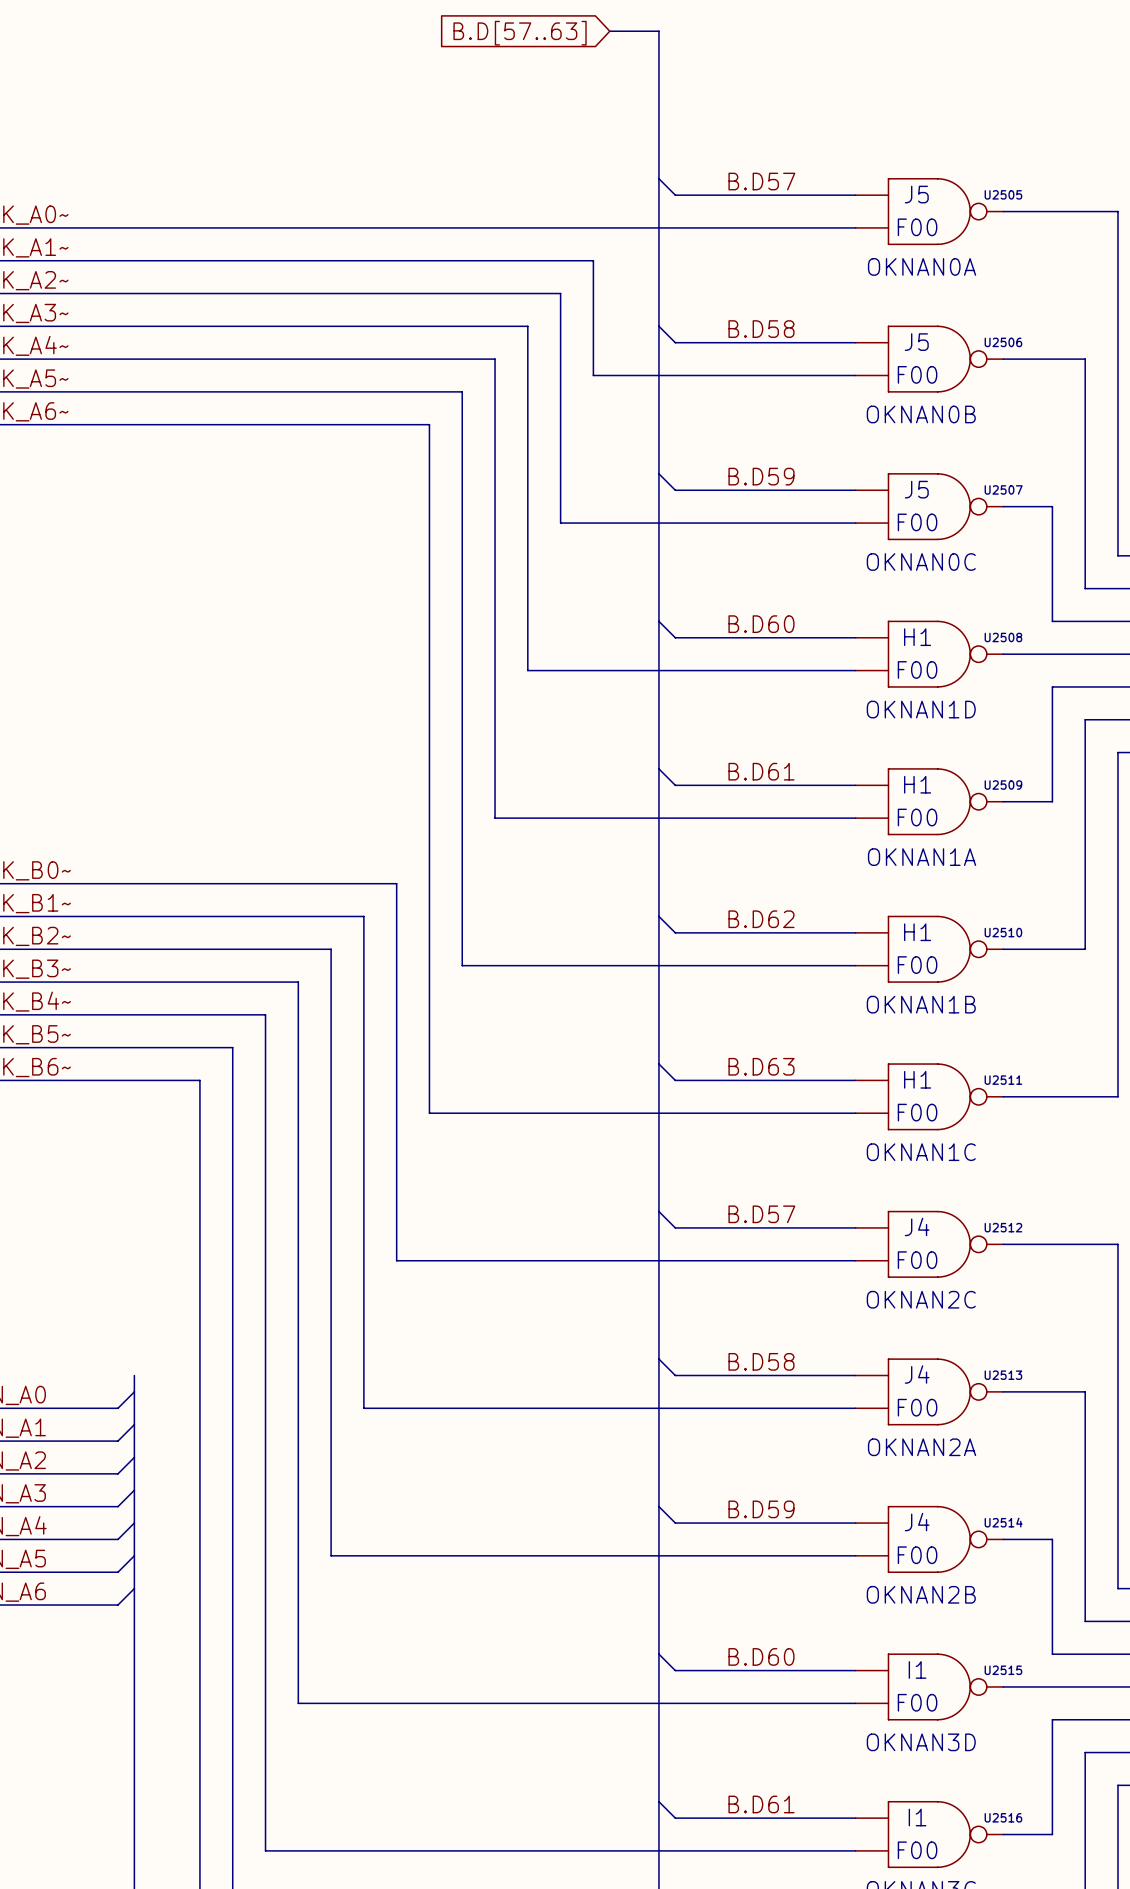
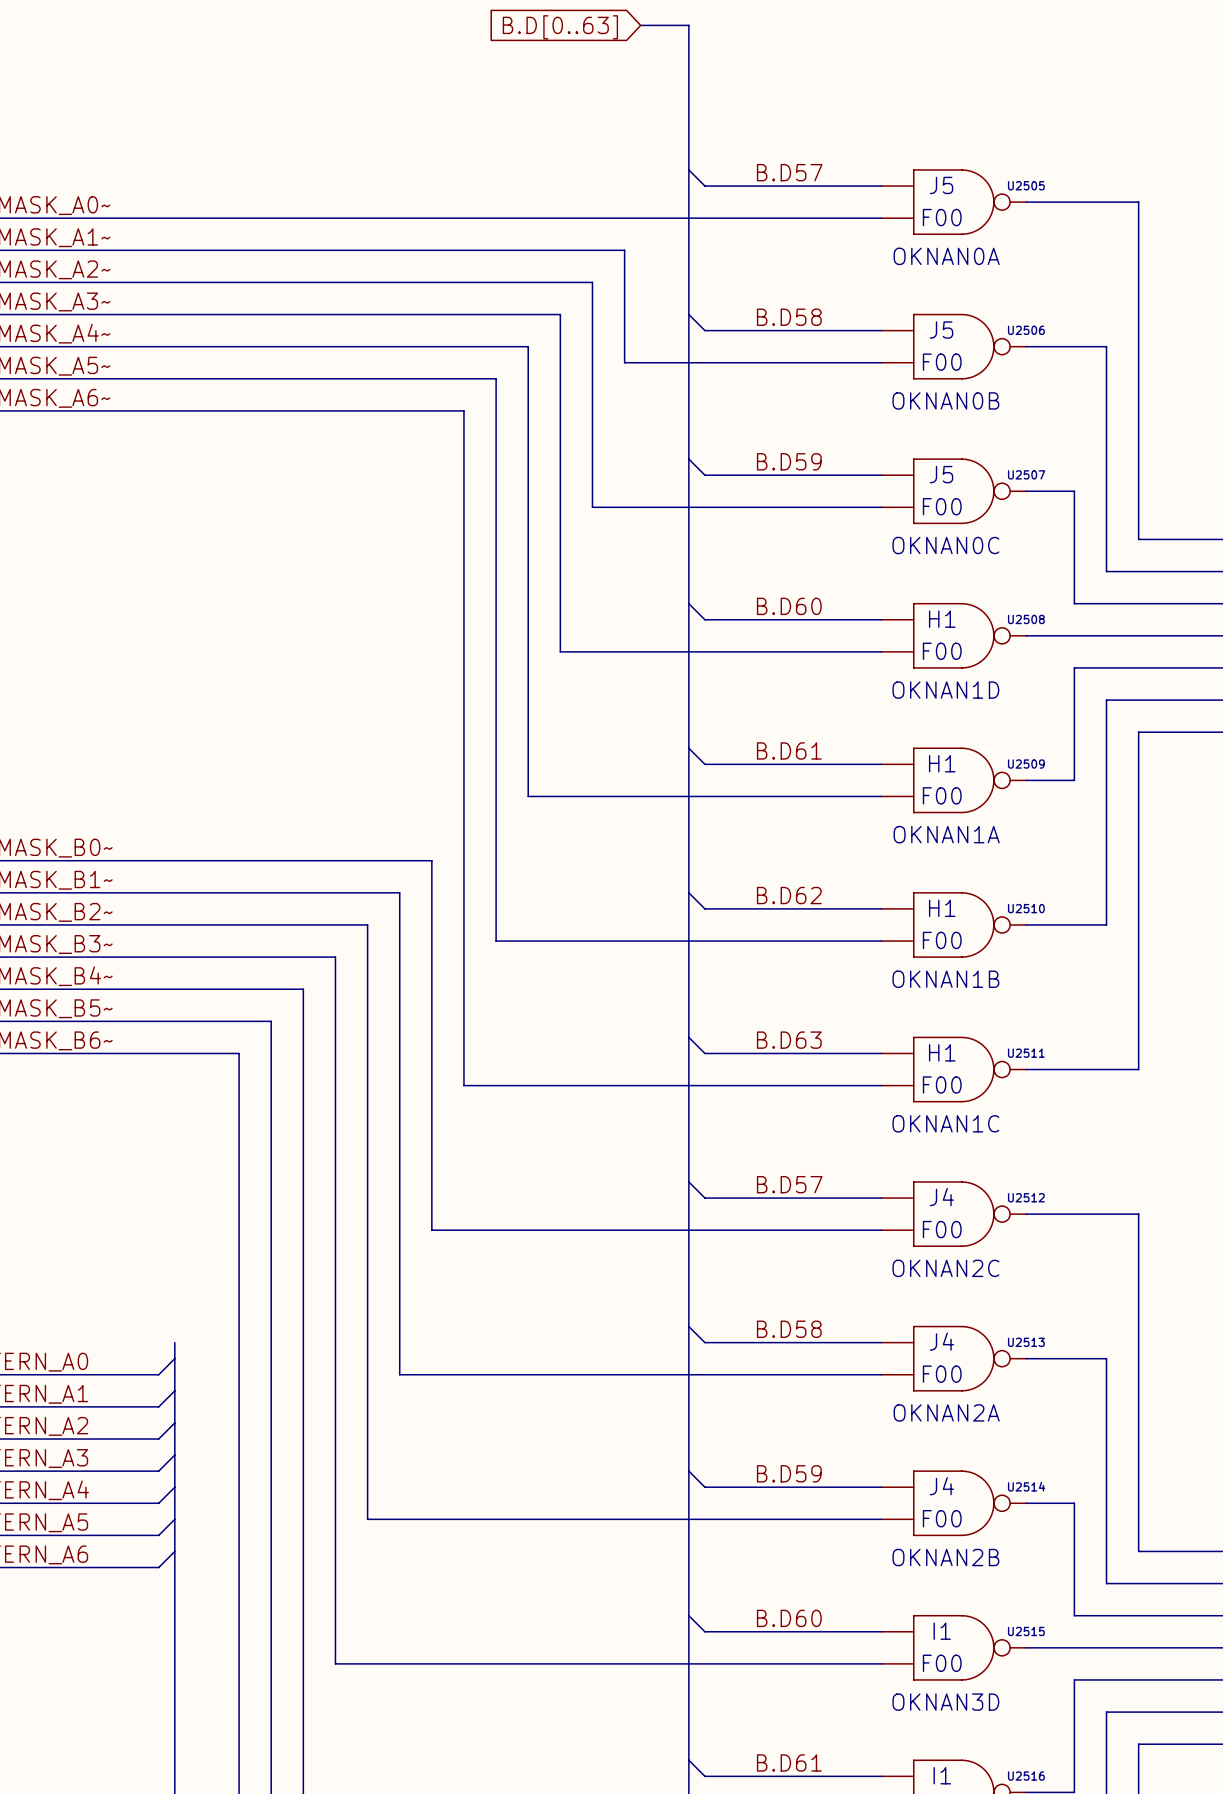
global label: B.D[57..63] (520, 33) -> B.D[0..63] (560, 27)

